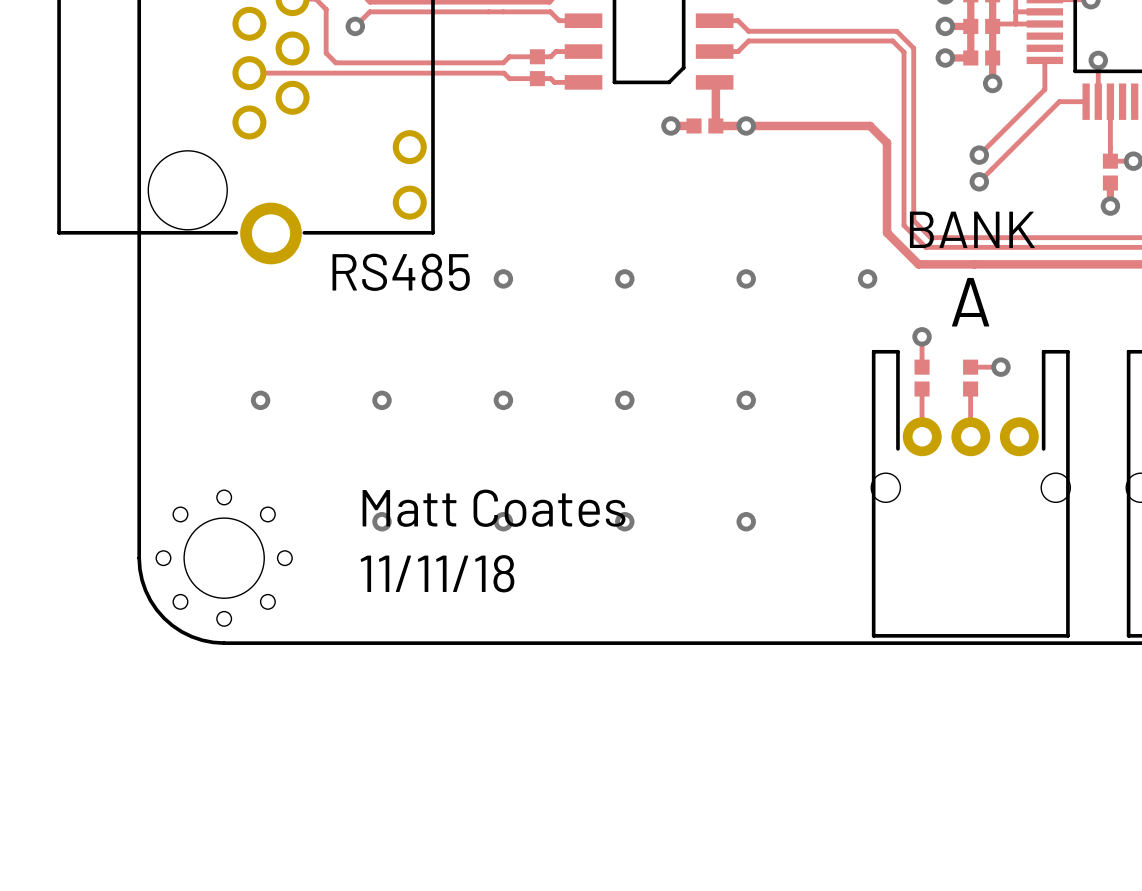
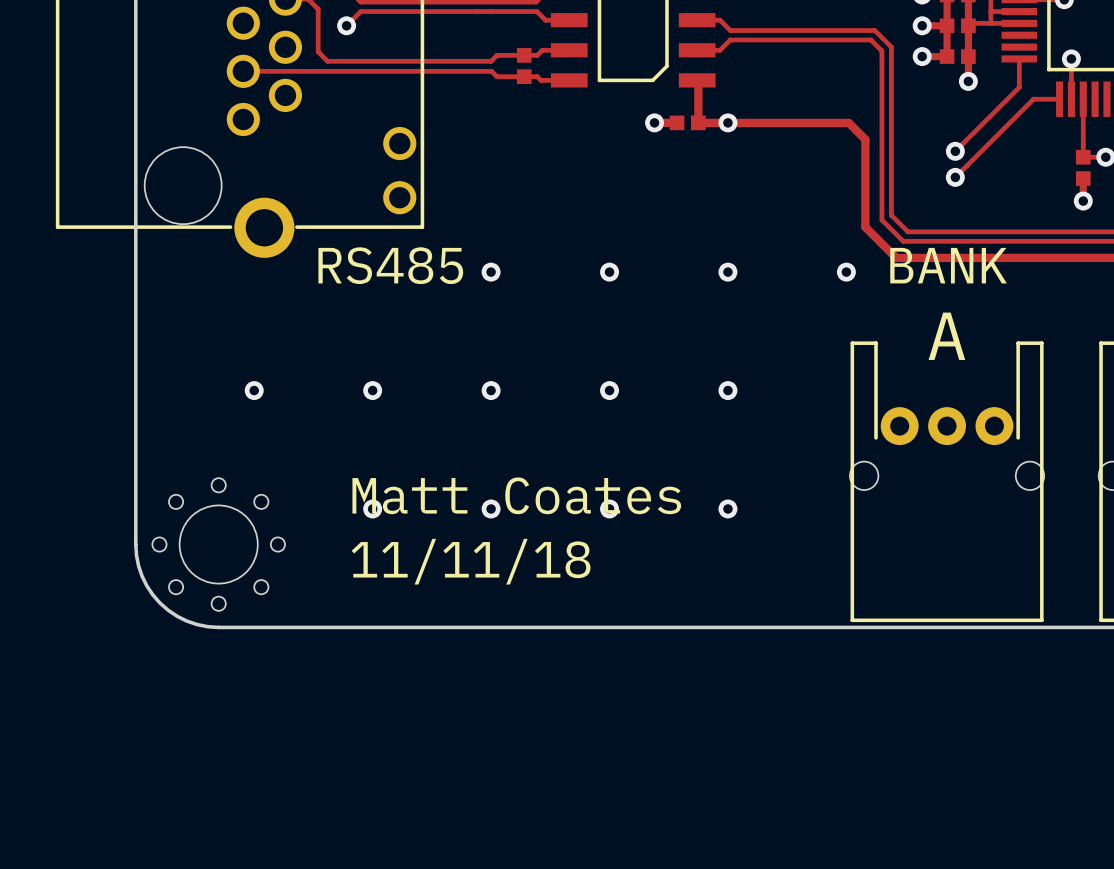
text position: BANK (972, 229) -> BANK (948, 265)
text position: A (970, 302) -> A (946, 336)
track: (922, 336) (922, 367) -> none
via: (922, 336) -> none
track: (970, 367) (1000, 367) -> none
via: (1000, 367) -> none
part: (922, 378) -> none
part: (970, 378) -> none
track: (922, 389) (922, 436) -> none
track: (970, 389) (970, 436) -> none

